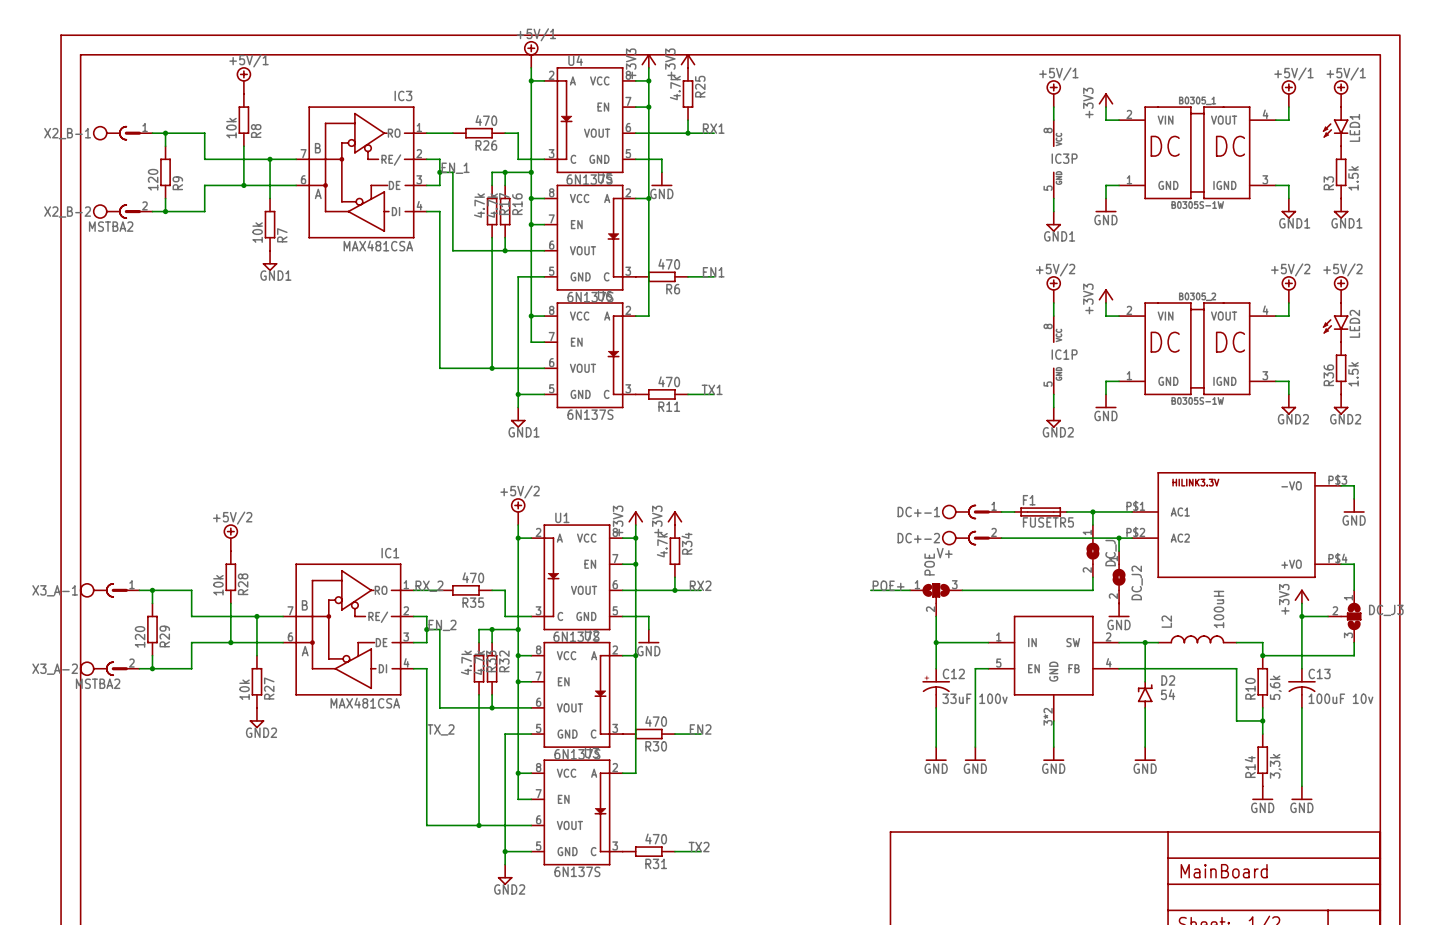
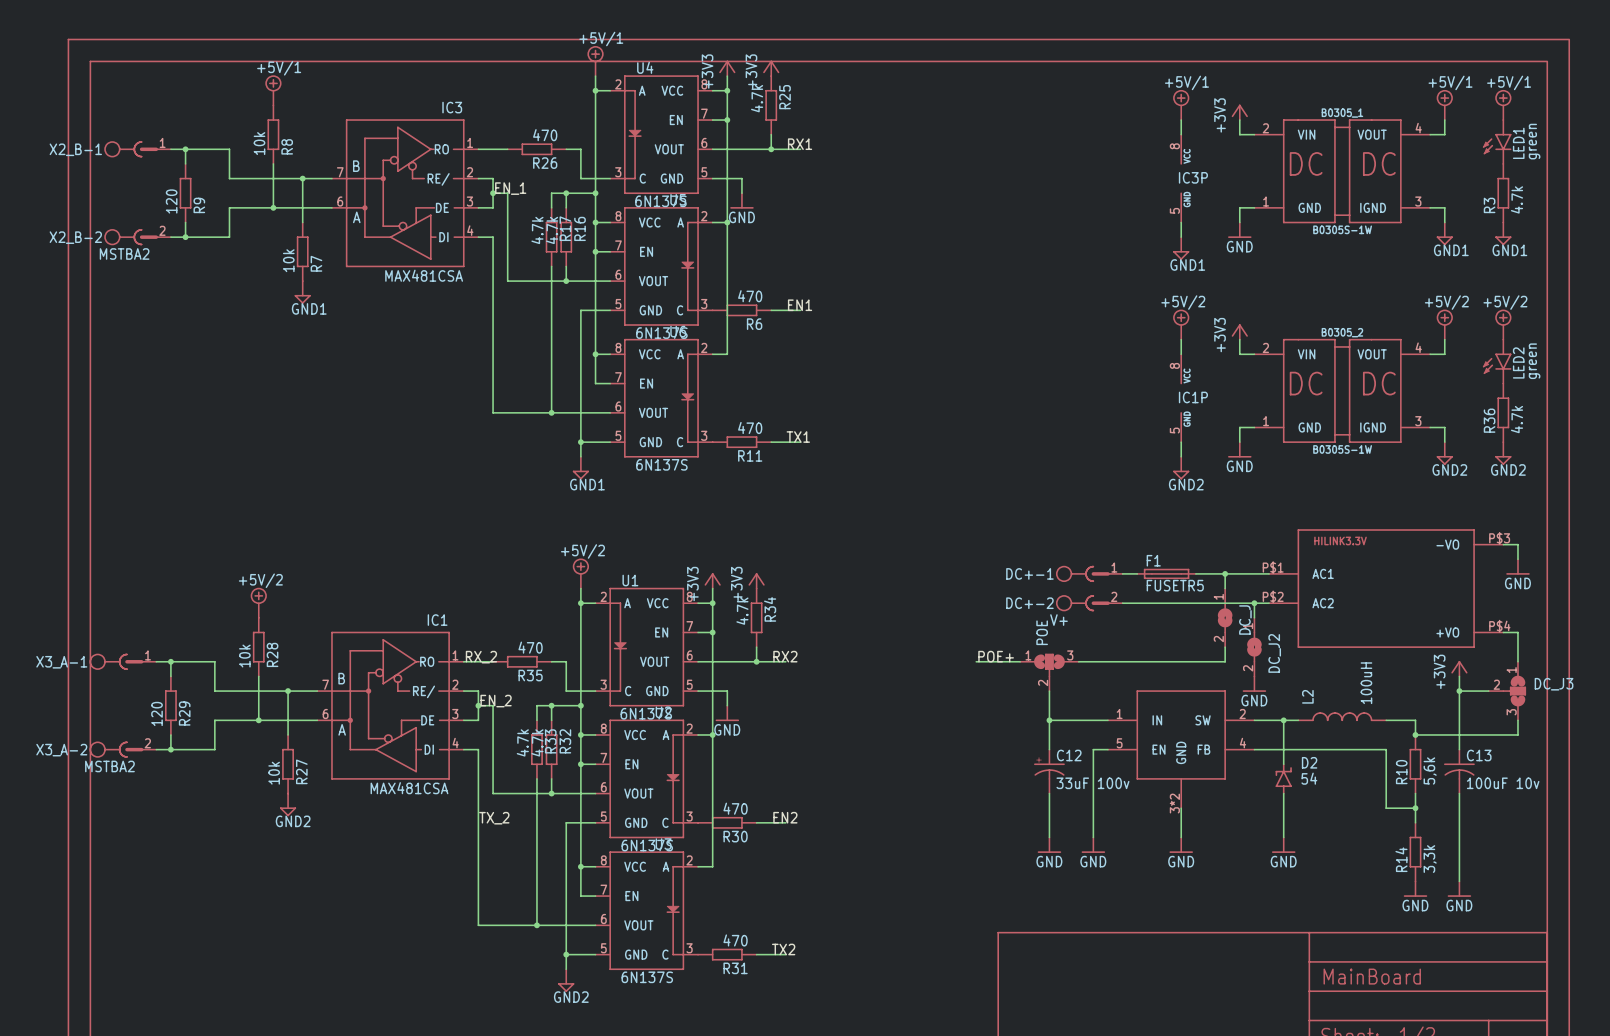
LED1 value: none -> green (1534, 141)
R3 value: 1.5k (1353, 178) -> 4.7k (1517, 199)
LED2 value: none -> green (1534, 361)
R36 value: 1.5k (1353, 374) -> 4.7k (1517, 419)

